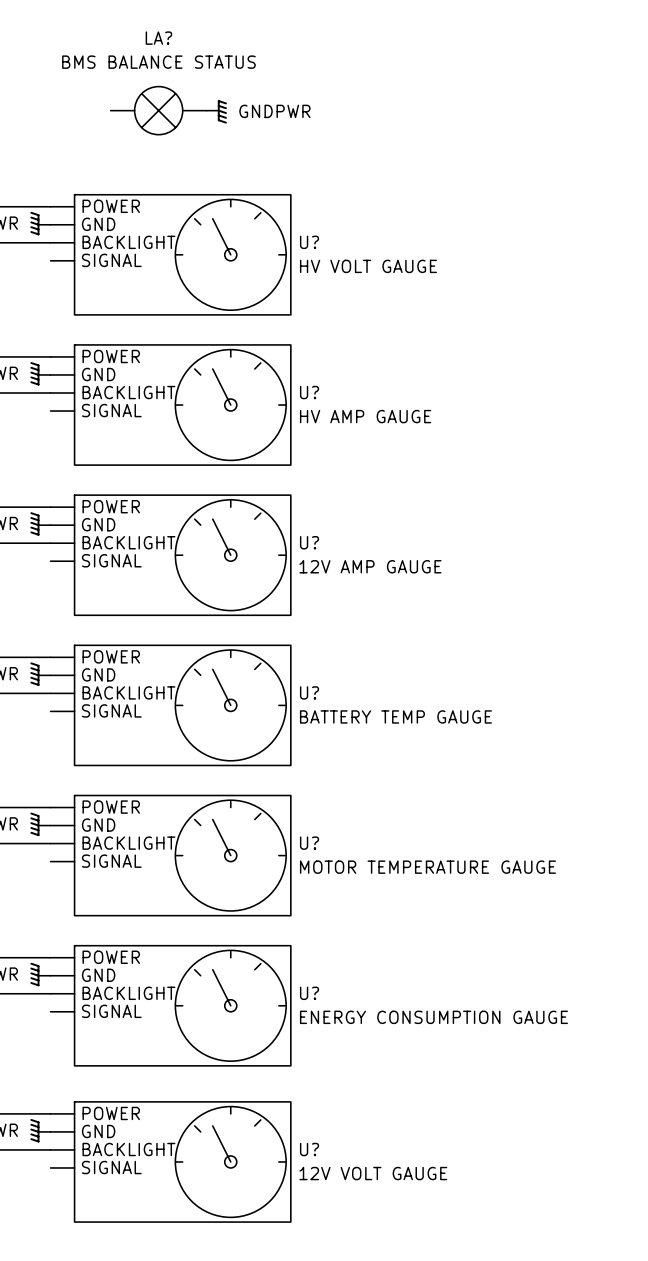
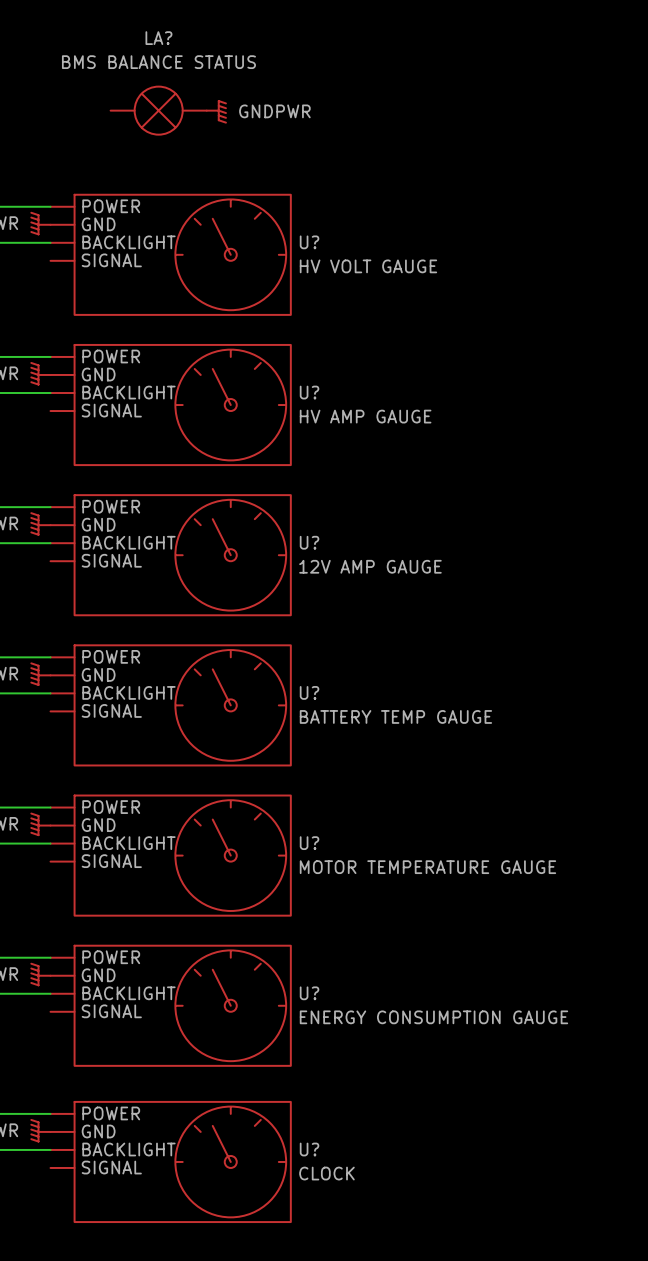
U? value: 12V VOLT GAUGE (373, 1173) -> CLOCK (326, 1173)

